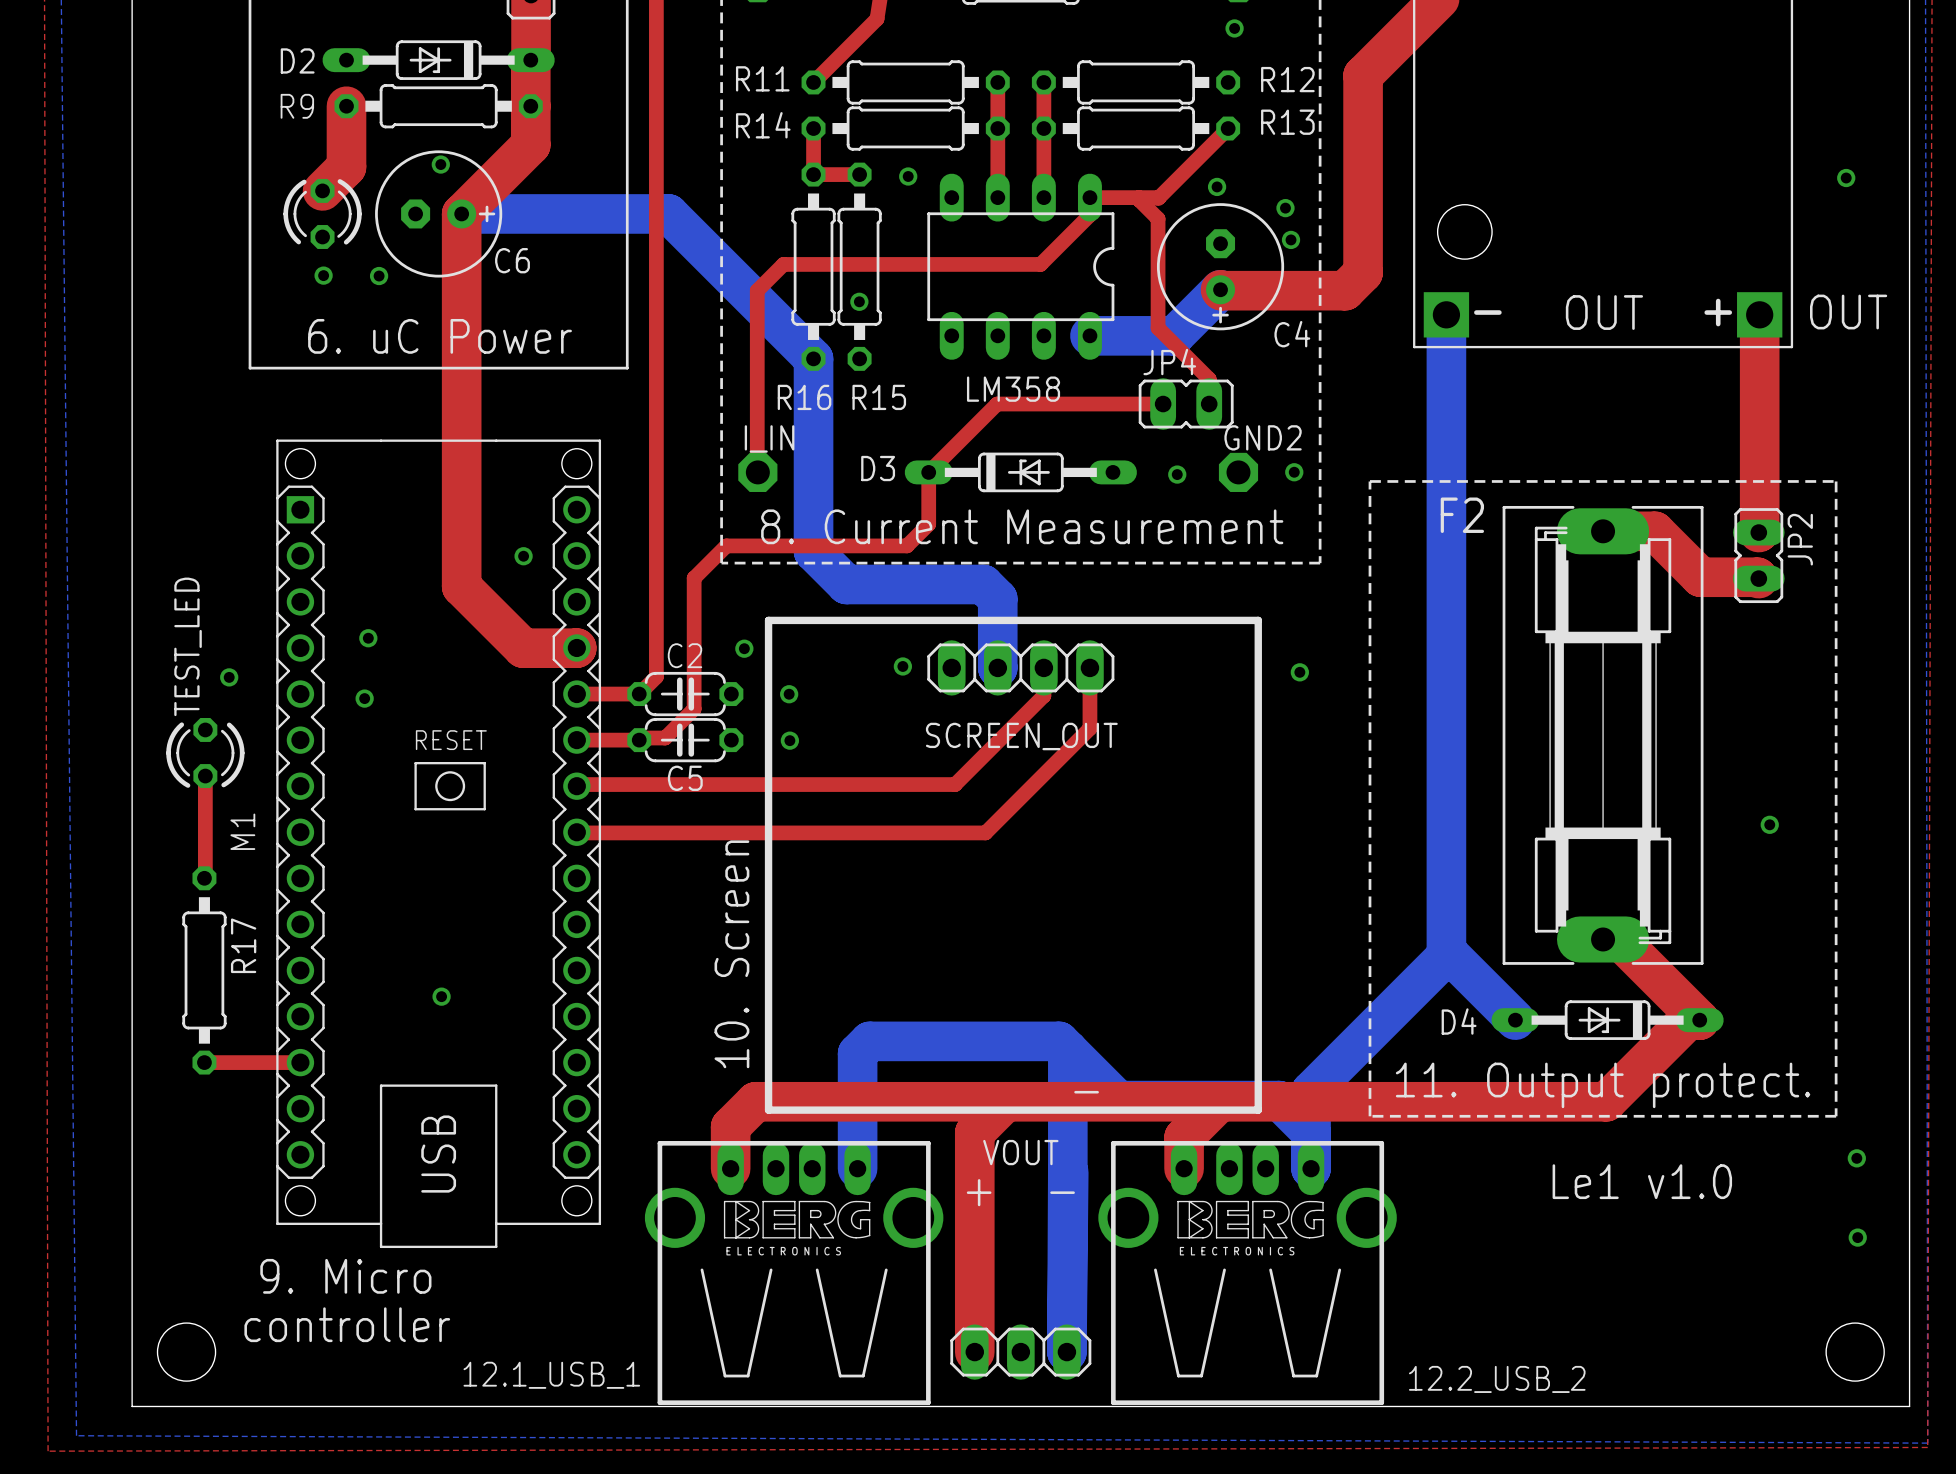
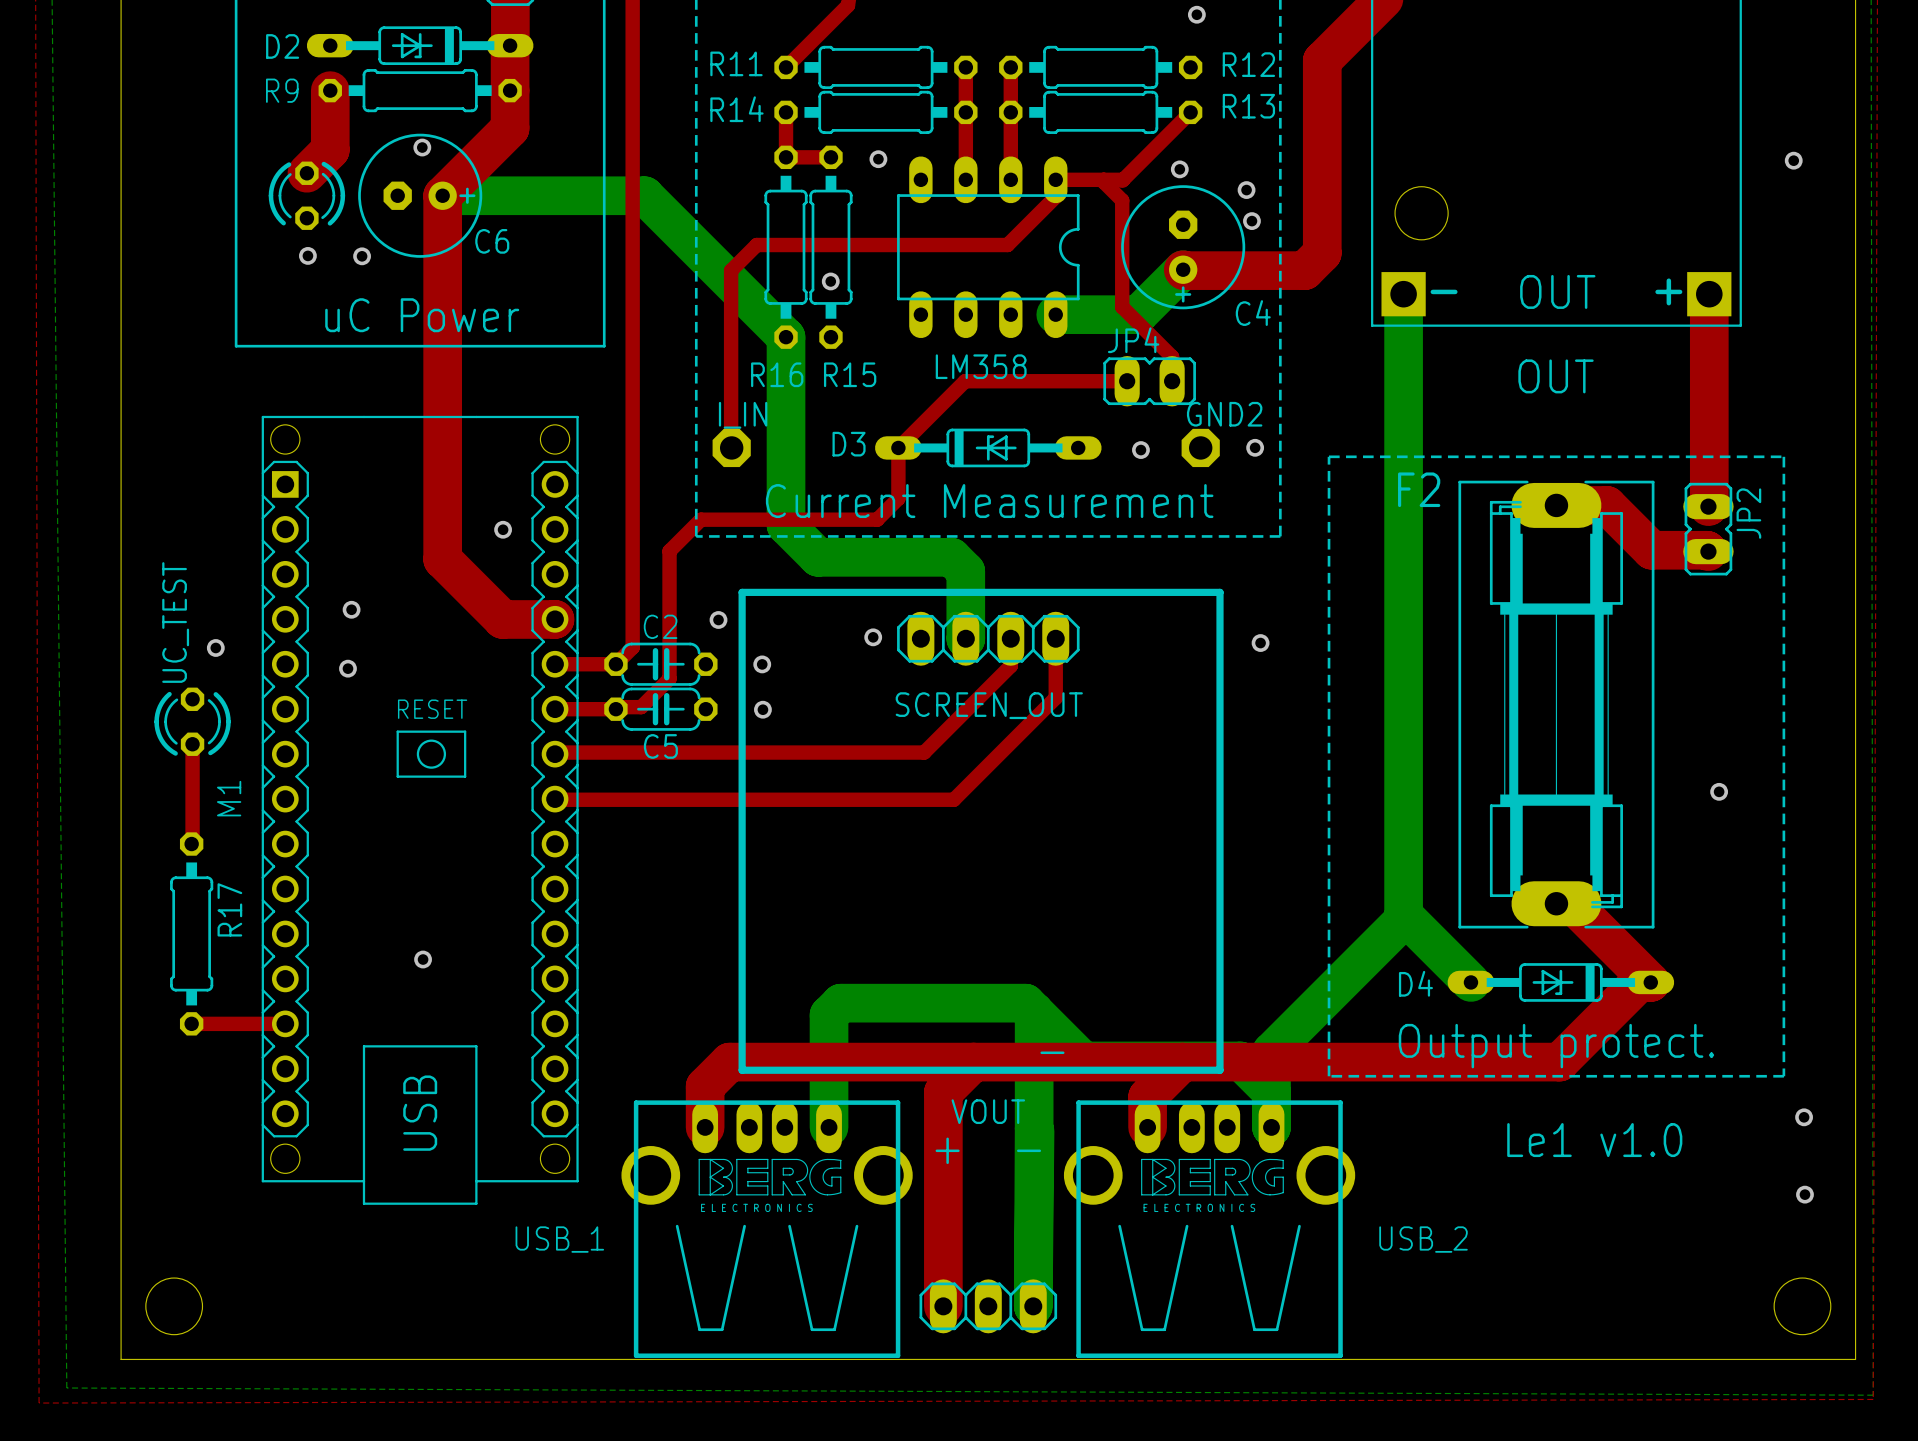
text position: OUT (1848, 312) -> OUT (1556, 376)
text: 6. uC Power (440, 336) -> uC Power (422, 315)
text: 8. Current Measurement (1022, 526) -> Current Measurement (989, 501)
TEST_LED name: TEST_LED (188, 646) -> UC_TEST (175, 622)
text: 10. Screen (731, 954) -> none
text: 11. Output protect. (1603, 1085) -> Output protect. (1556, 1046)
text: 9. Micro (345, 1276) -> none
text: controller (347, 1324) -> none
12.1_USB_1 name: 12.1_USB_1 (551, 1375) -> USB_1 (559, 1239)
12.2_USB_2 name: 12.2_USB_2 (1497, 1379) -> USB_2 (1423, 1239)

